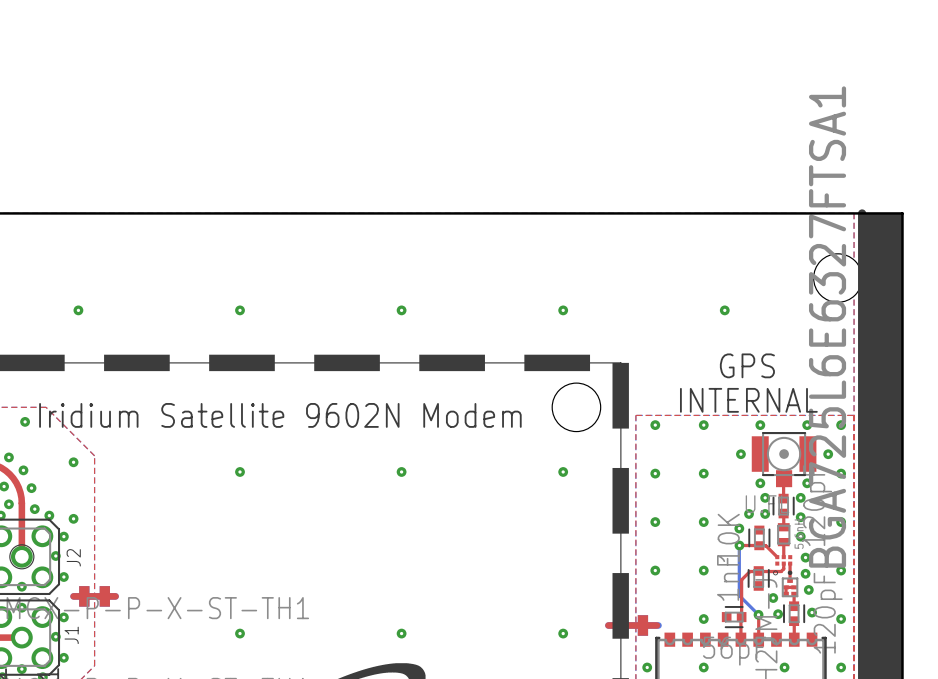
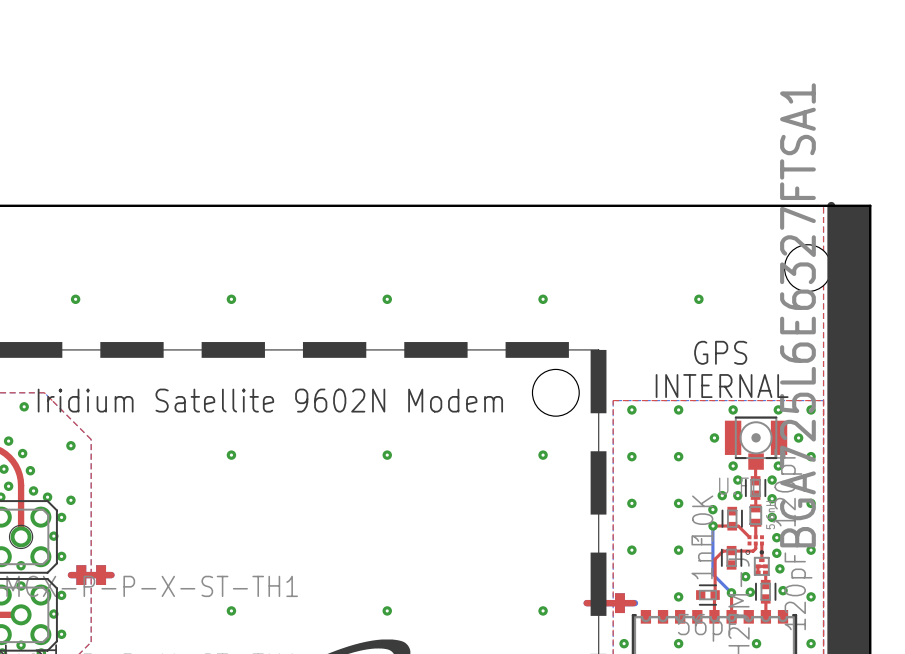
J2 name: J2 (73, 557) -> none
J1 name: J1 (71, 635) -> none

